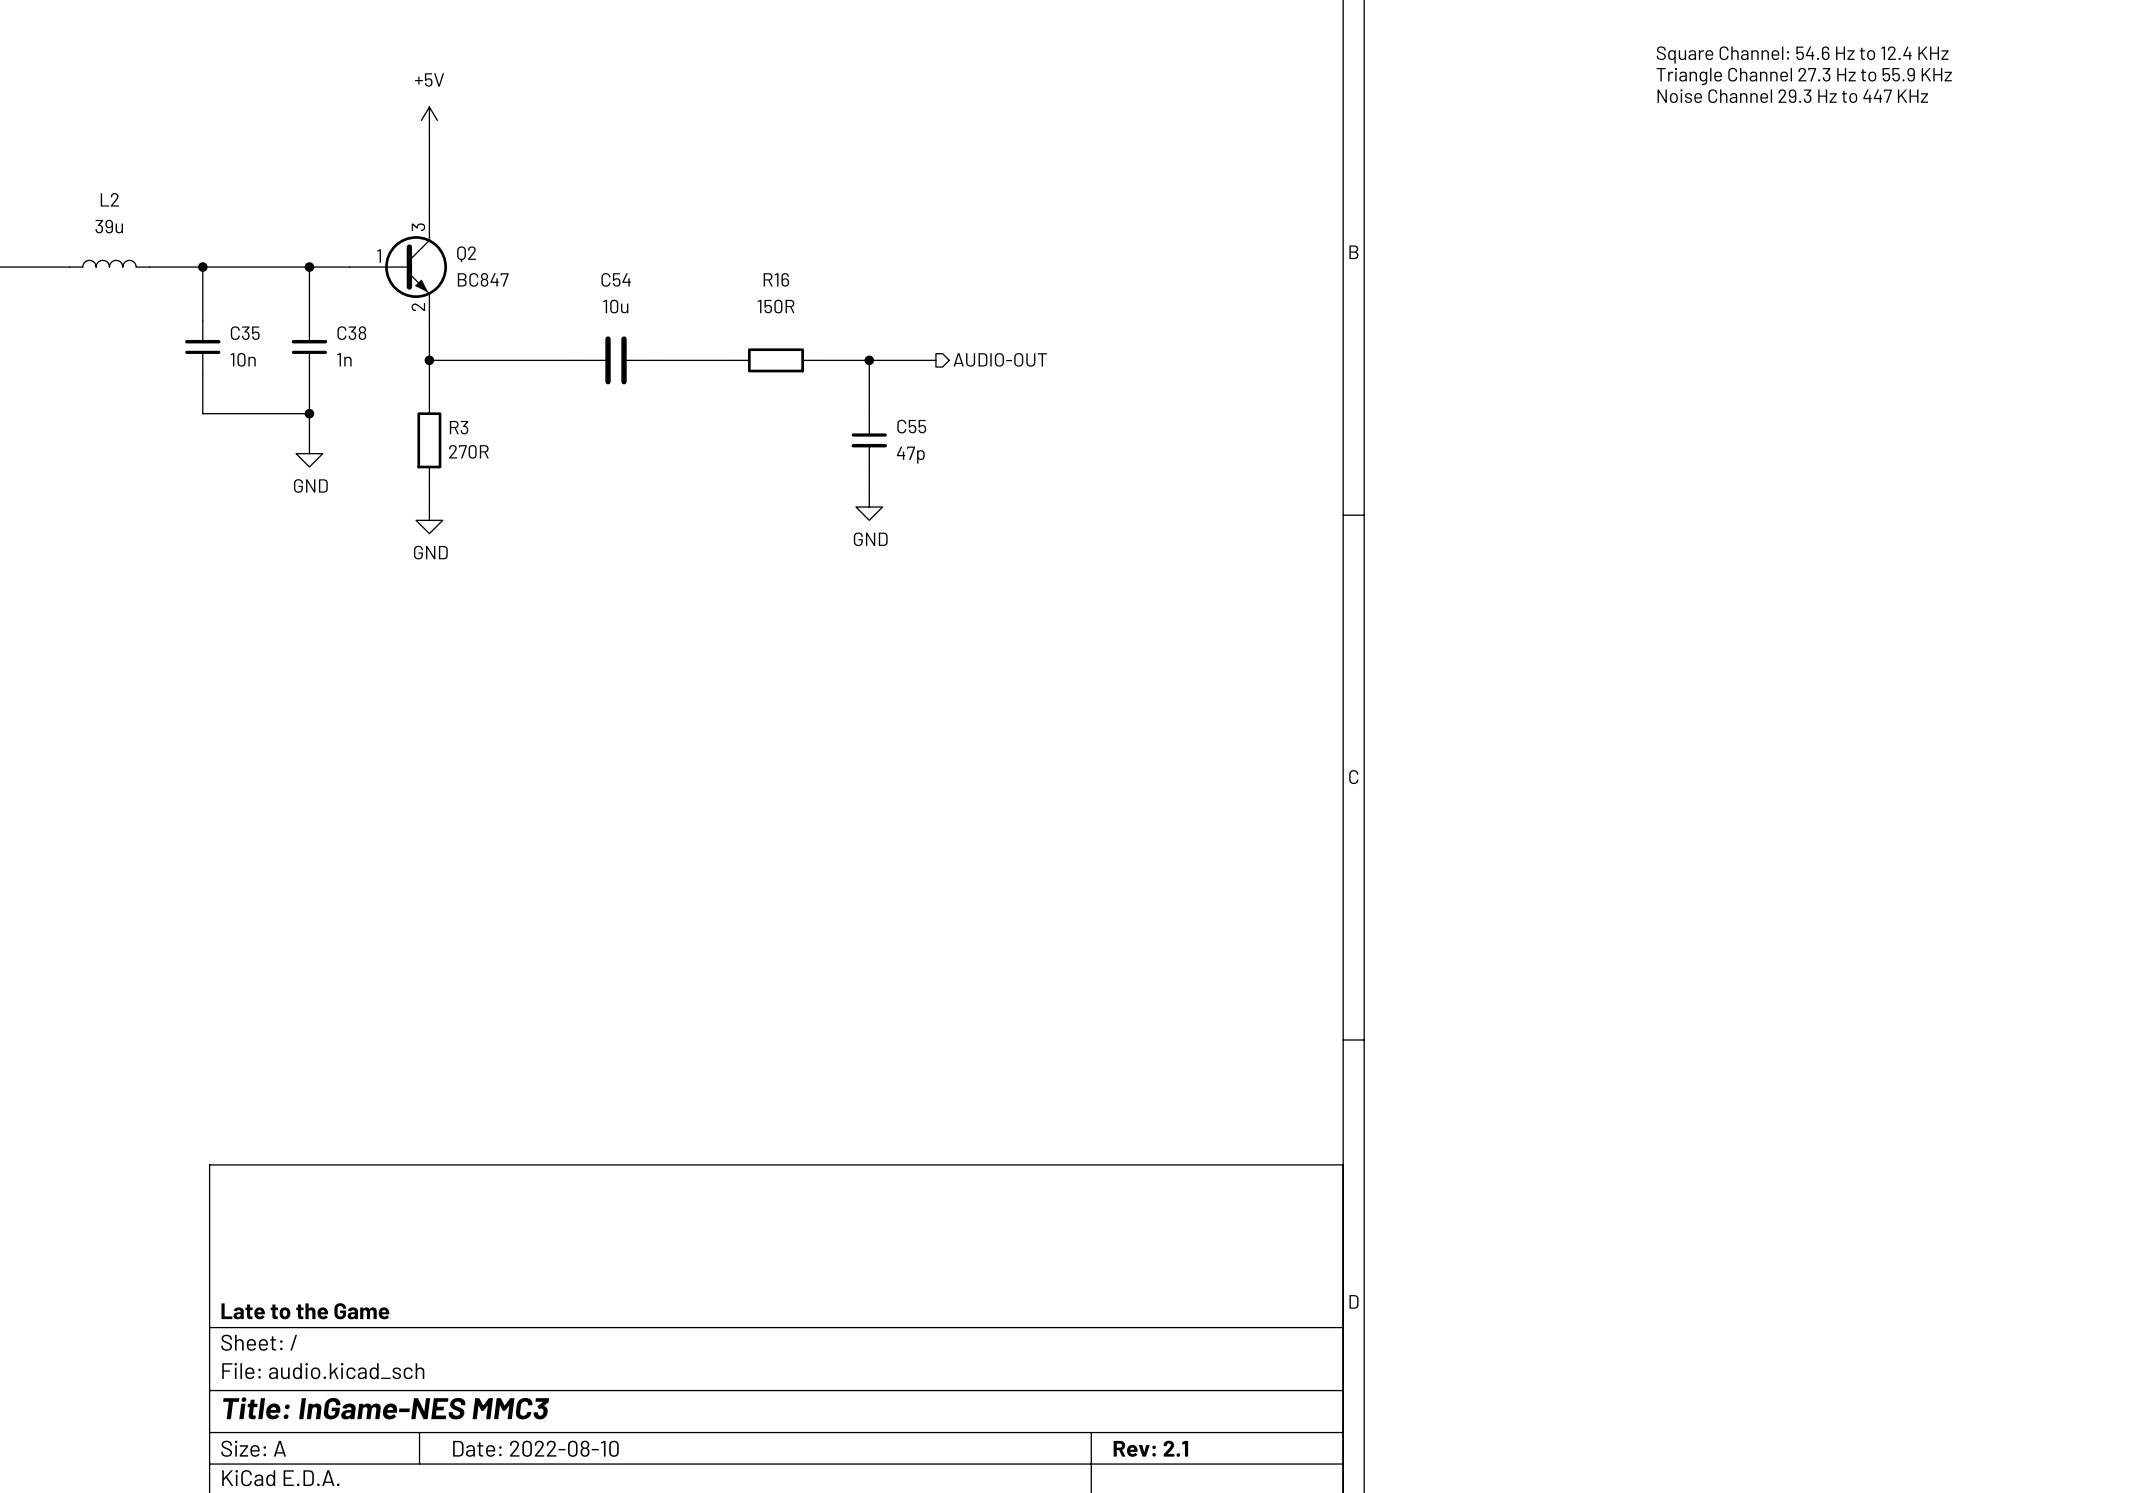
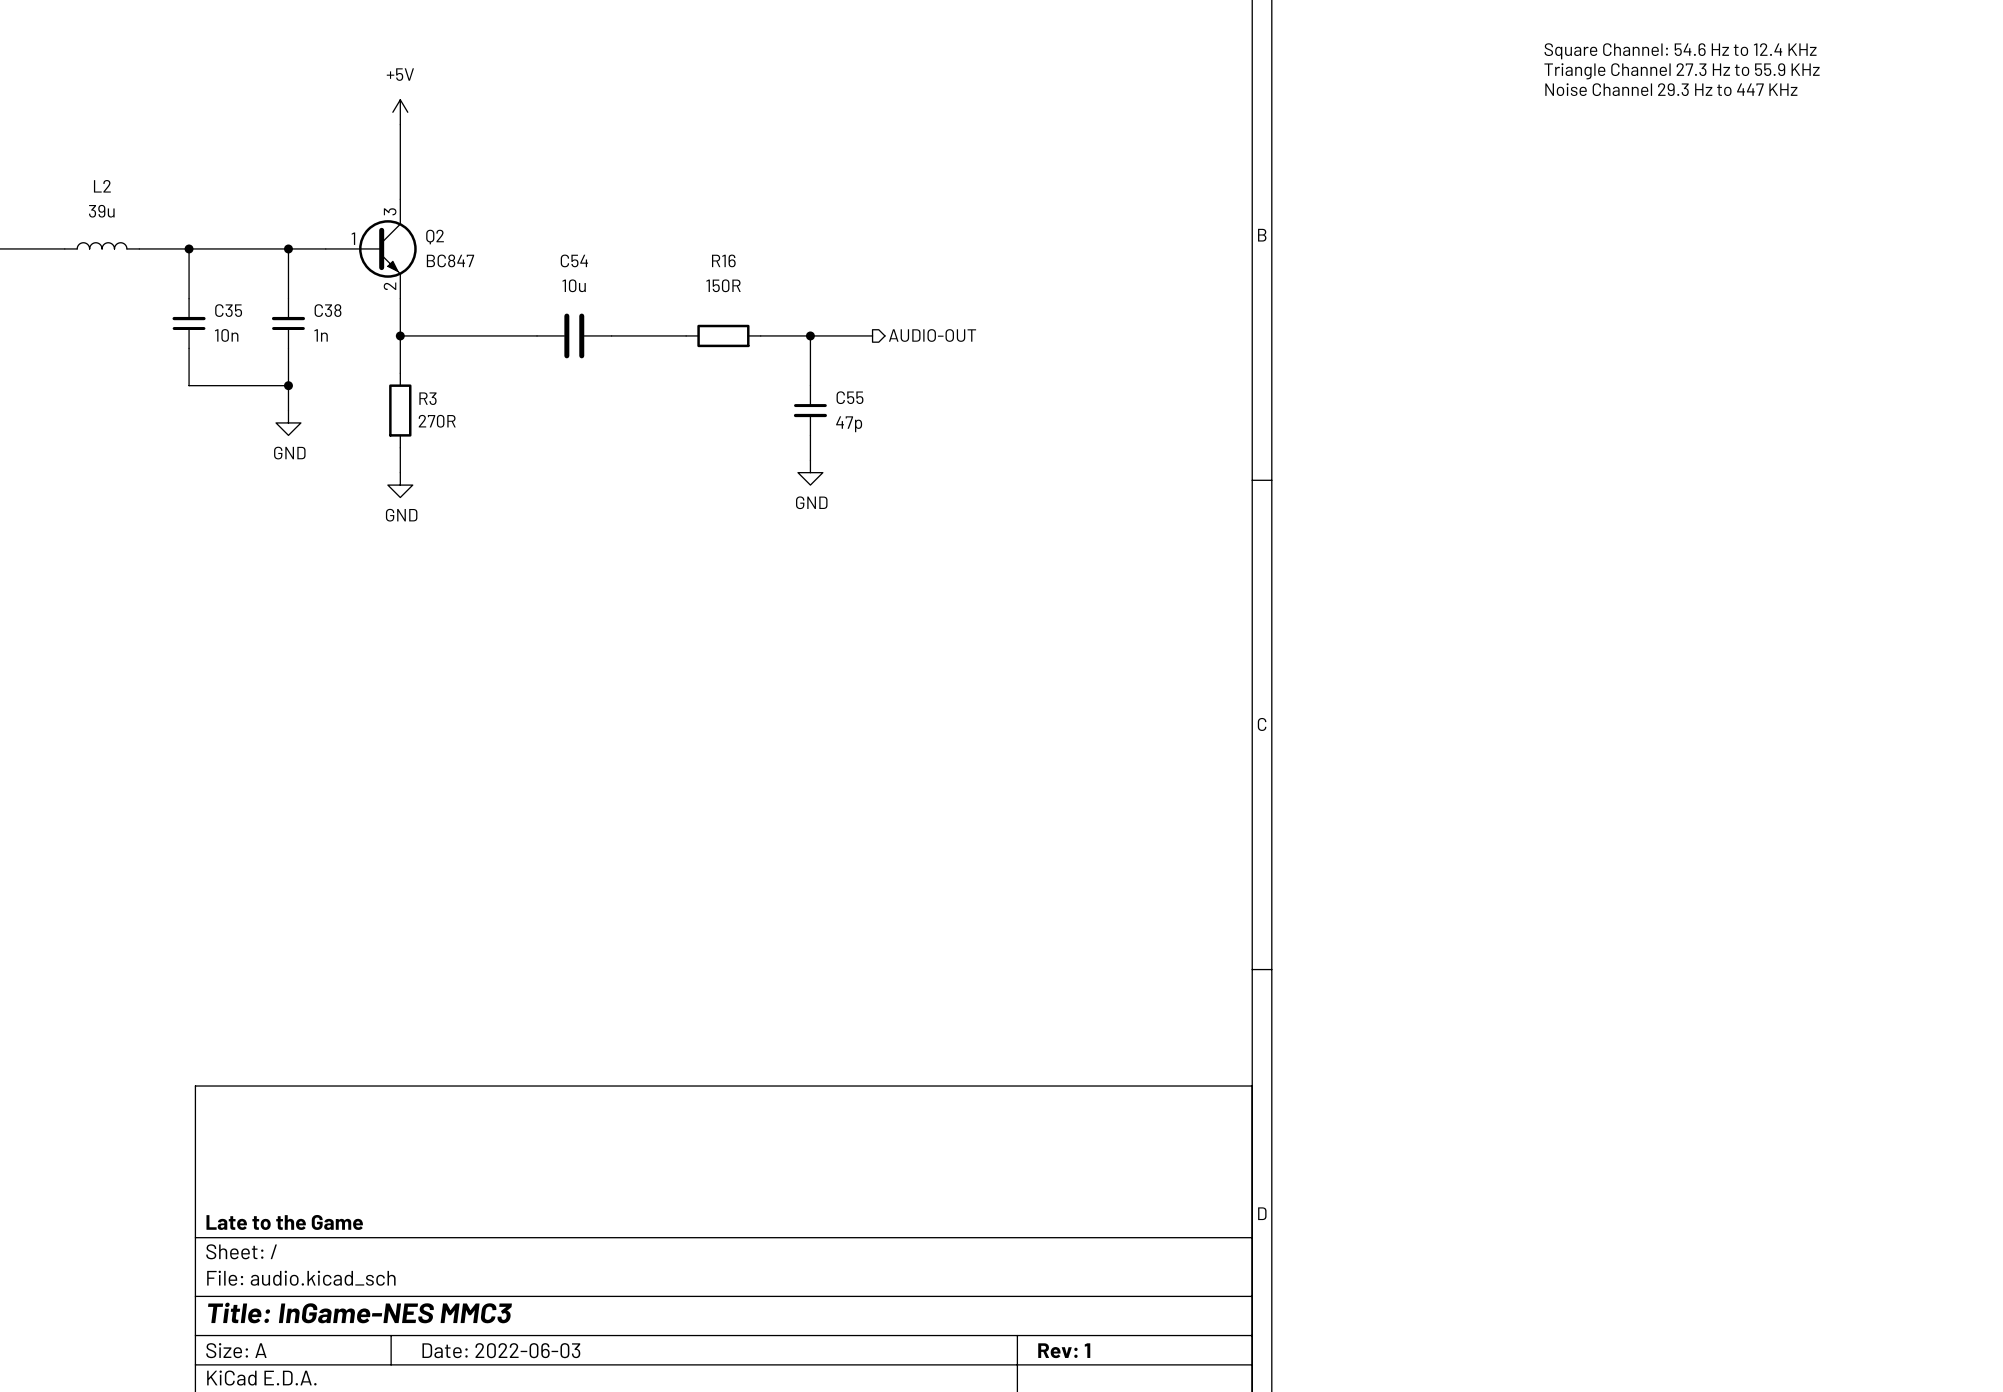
title block: Date: 2022-08-10 (535, 1448) -> Date: 2022-06-03 (501, 1350)
title block: Rev: 2.1 (1150, 1448) -> Rev: 1 (1064, 1350)

